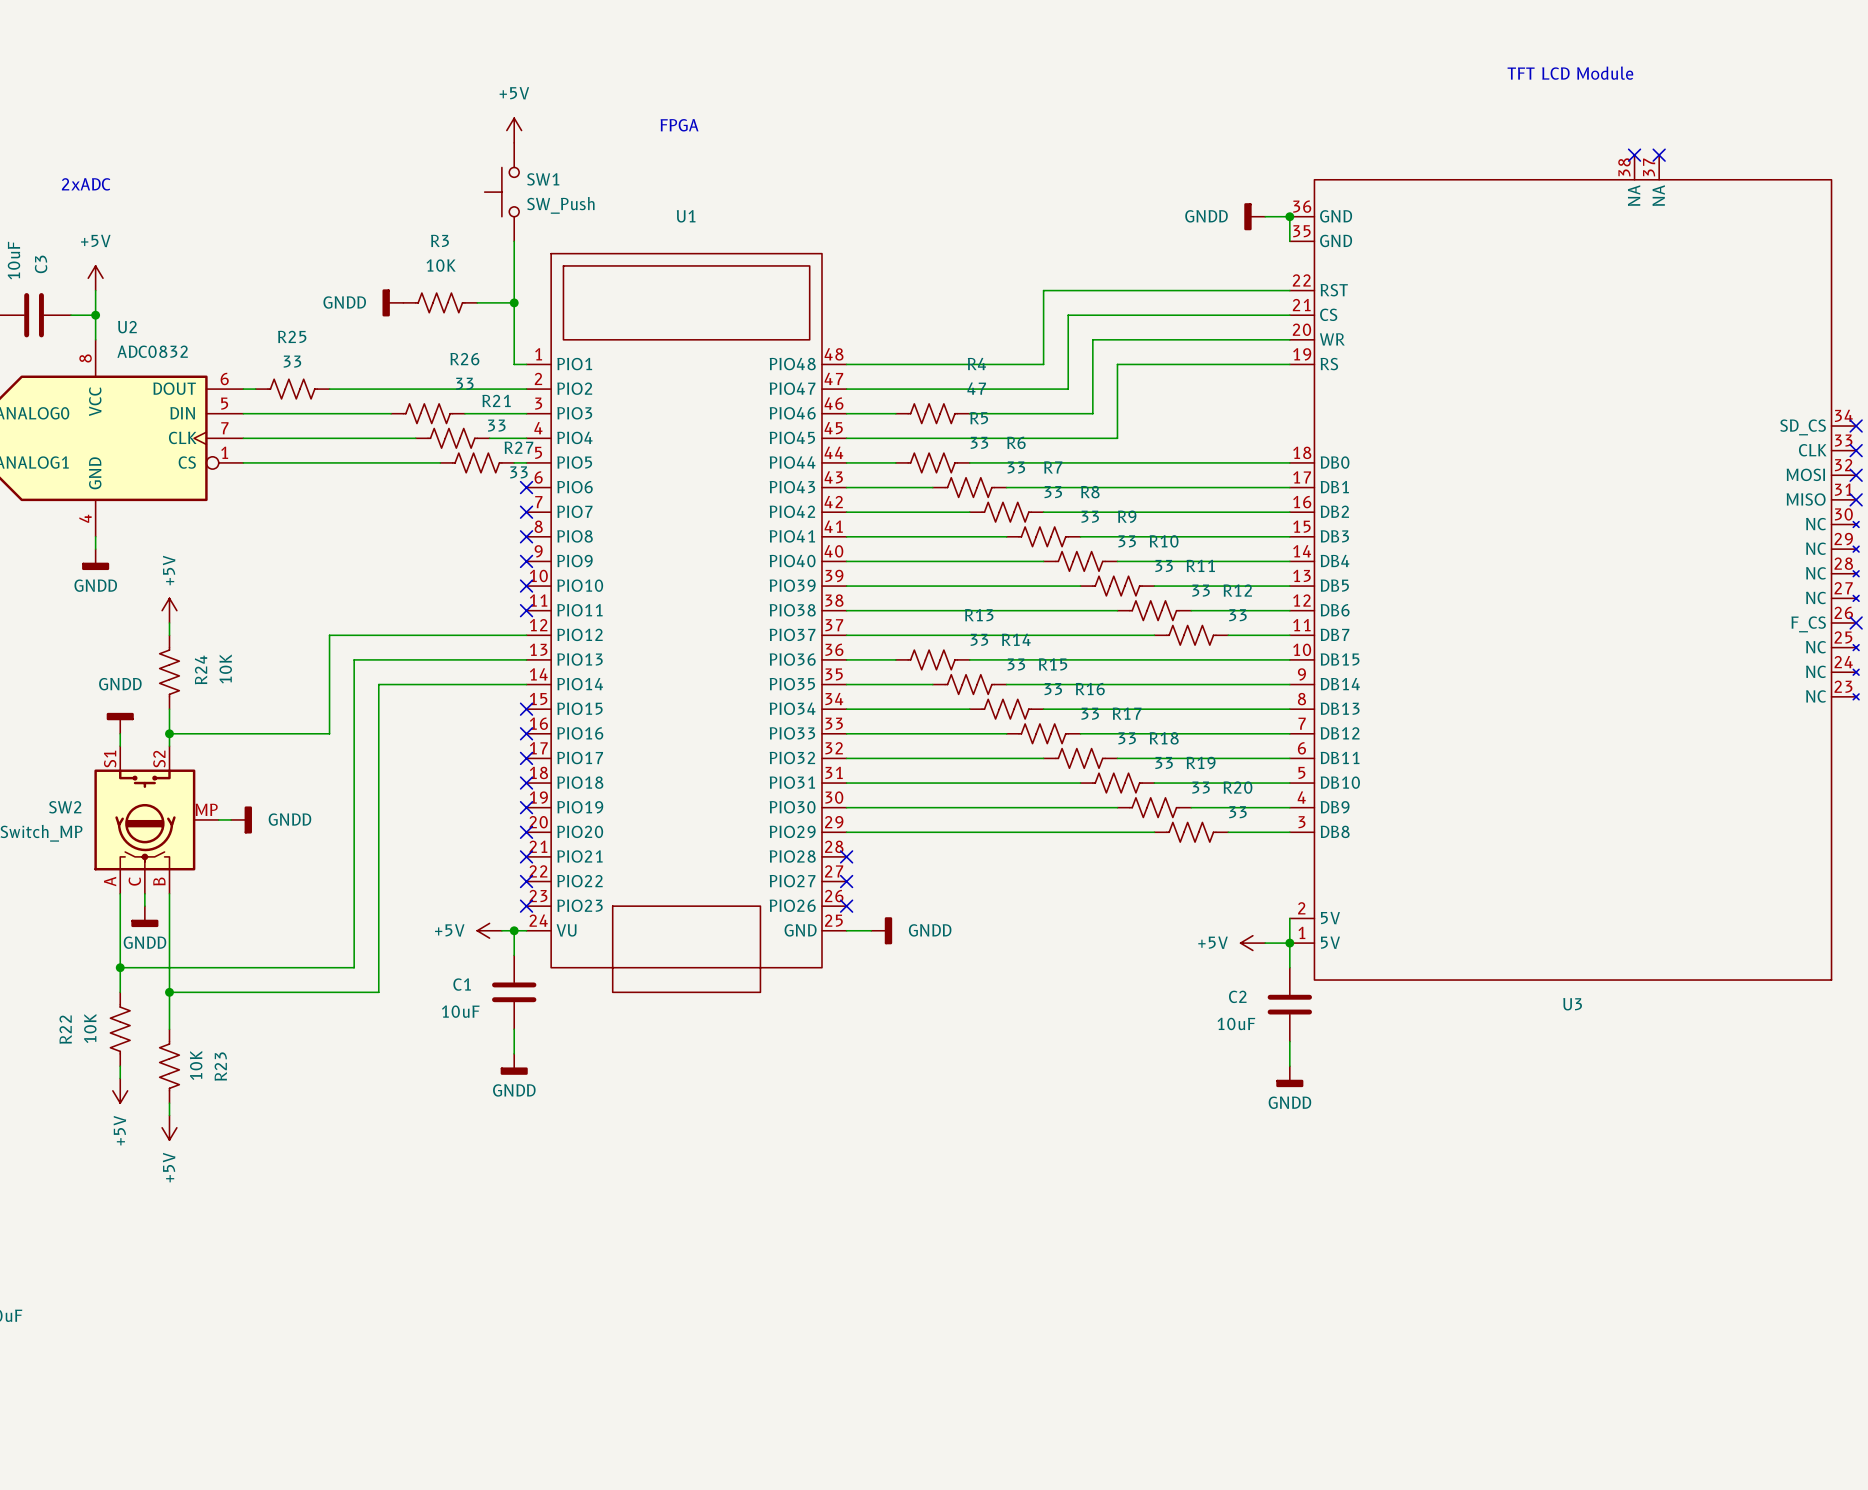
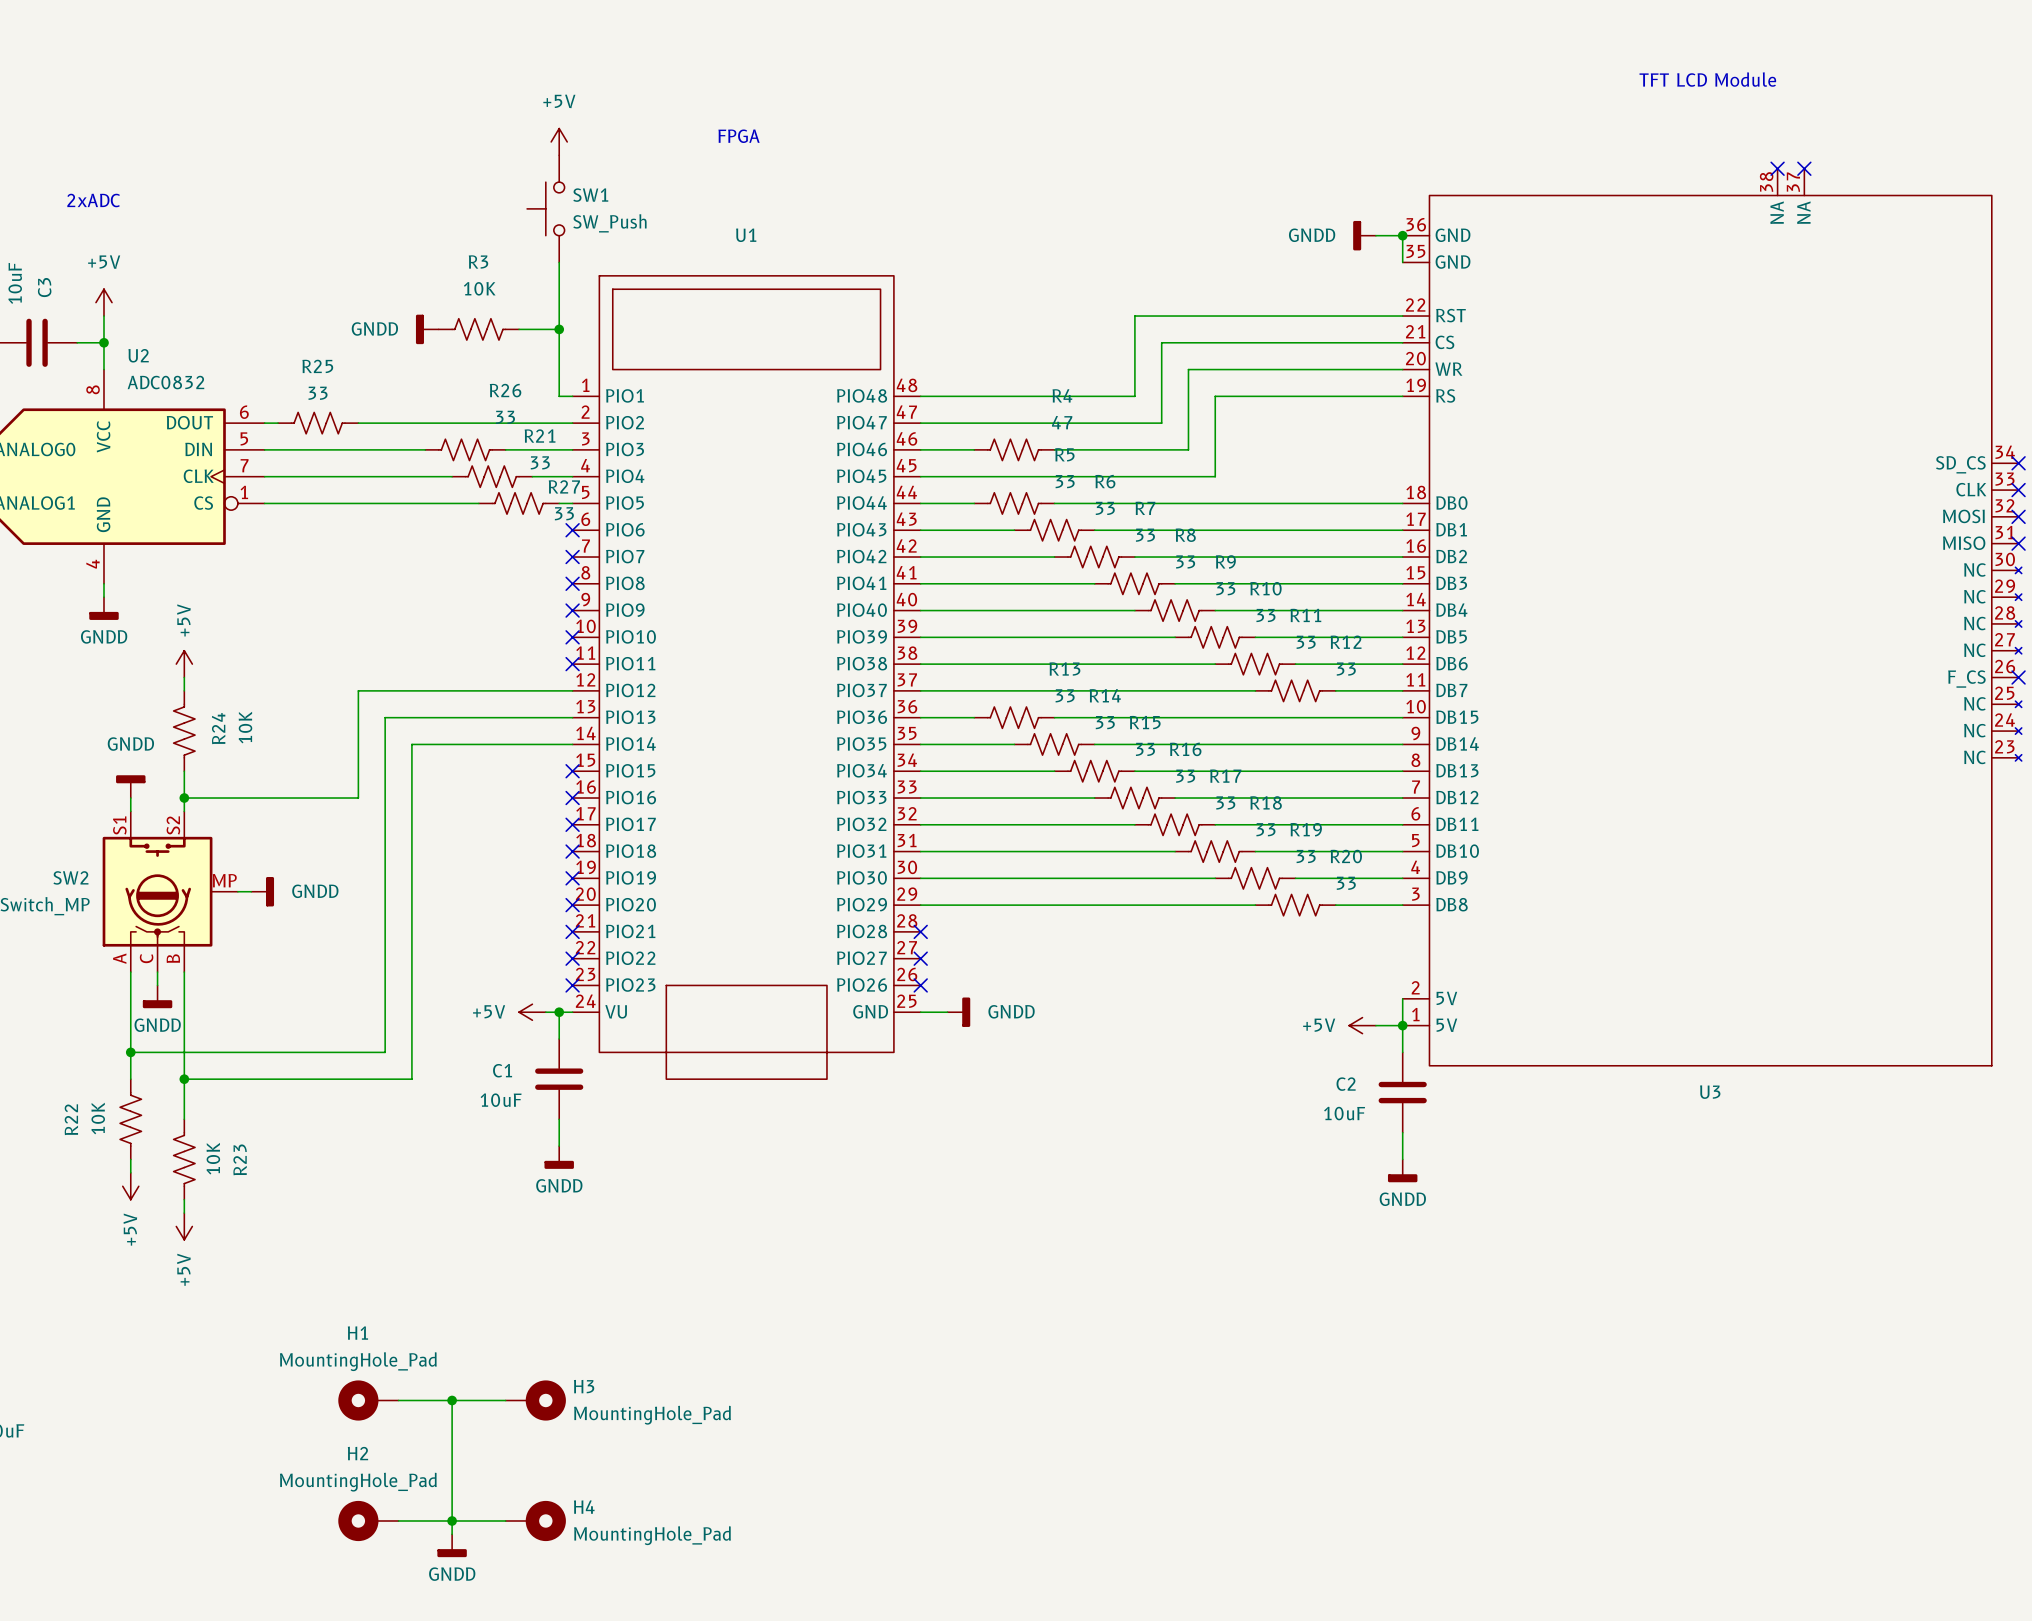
H1: none -> MountingHole_Pad (368, 1400)
wire: none -> (398, 1400) (505, 1400)
wire: none -> (452, 1400) (452, 1534)
junction: none -> (452, 1400)
H3: none -> MountingHole_Pad (535, 1400)
H2: none -> MountingHole_Pad (368, 1520)
wire: none -> (398, 1520) (505, 1520)
junction: none -> (452, 1520)
H4: none -> MountingHole_Pad (535, 1520)
power symbol: none -> GNDD (452, 1545)

